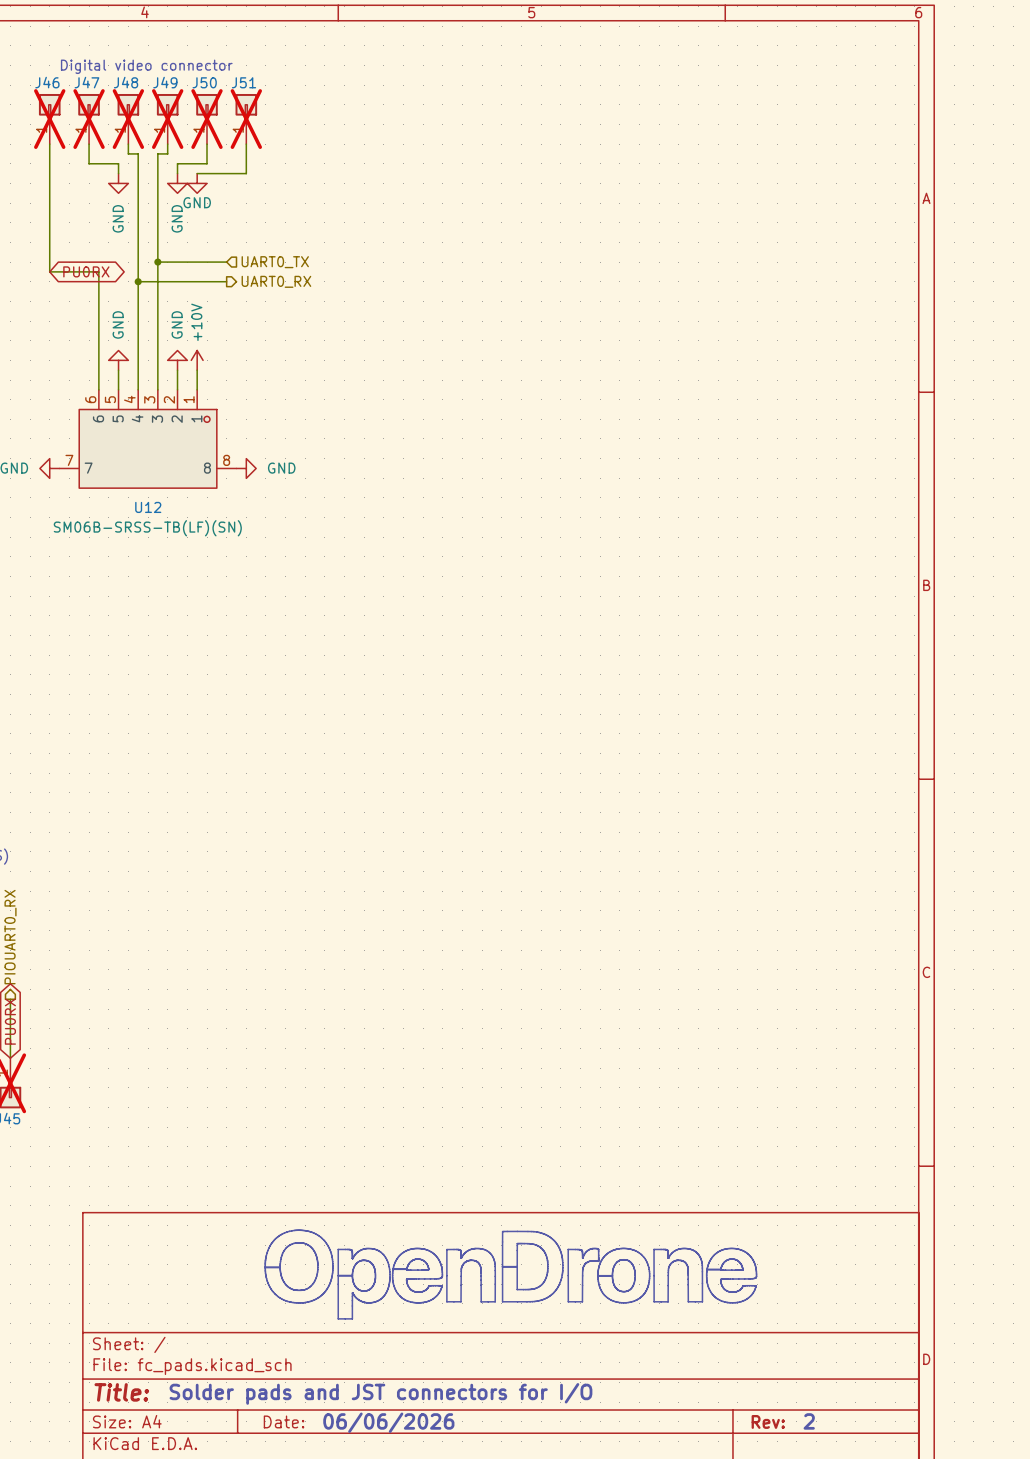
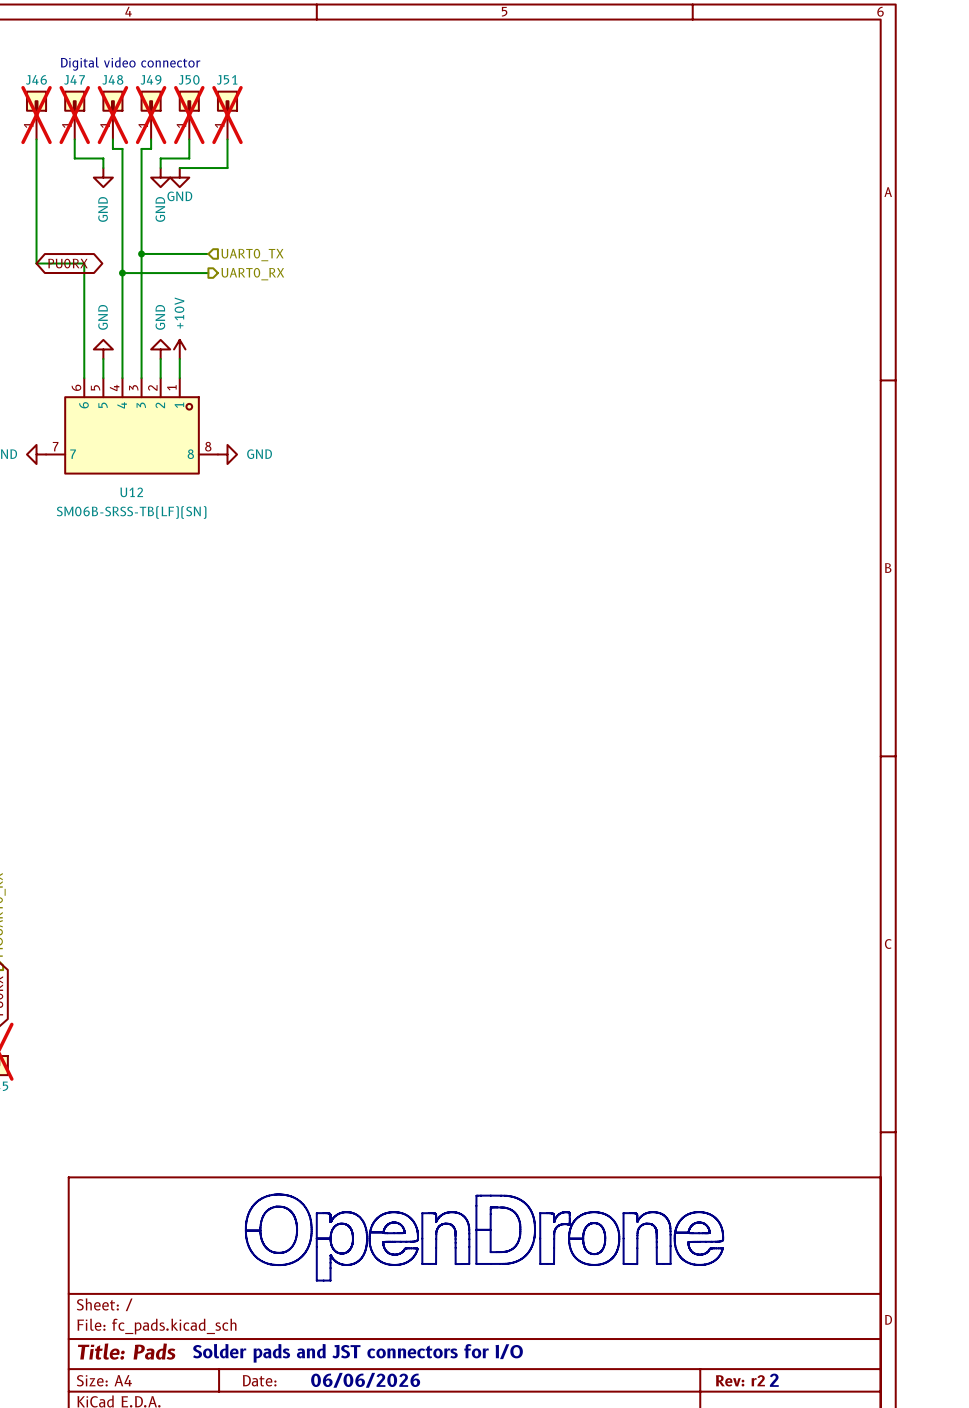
title block: Title: (121, 1392) -> Title: Pads (126, 1351)
title block: Rev: (768, 1421) -> Rev: r2 (740, 1380)

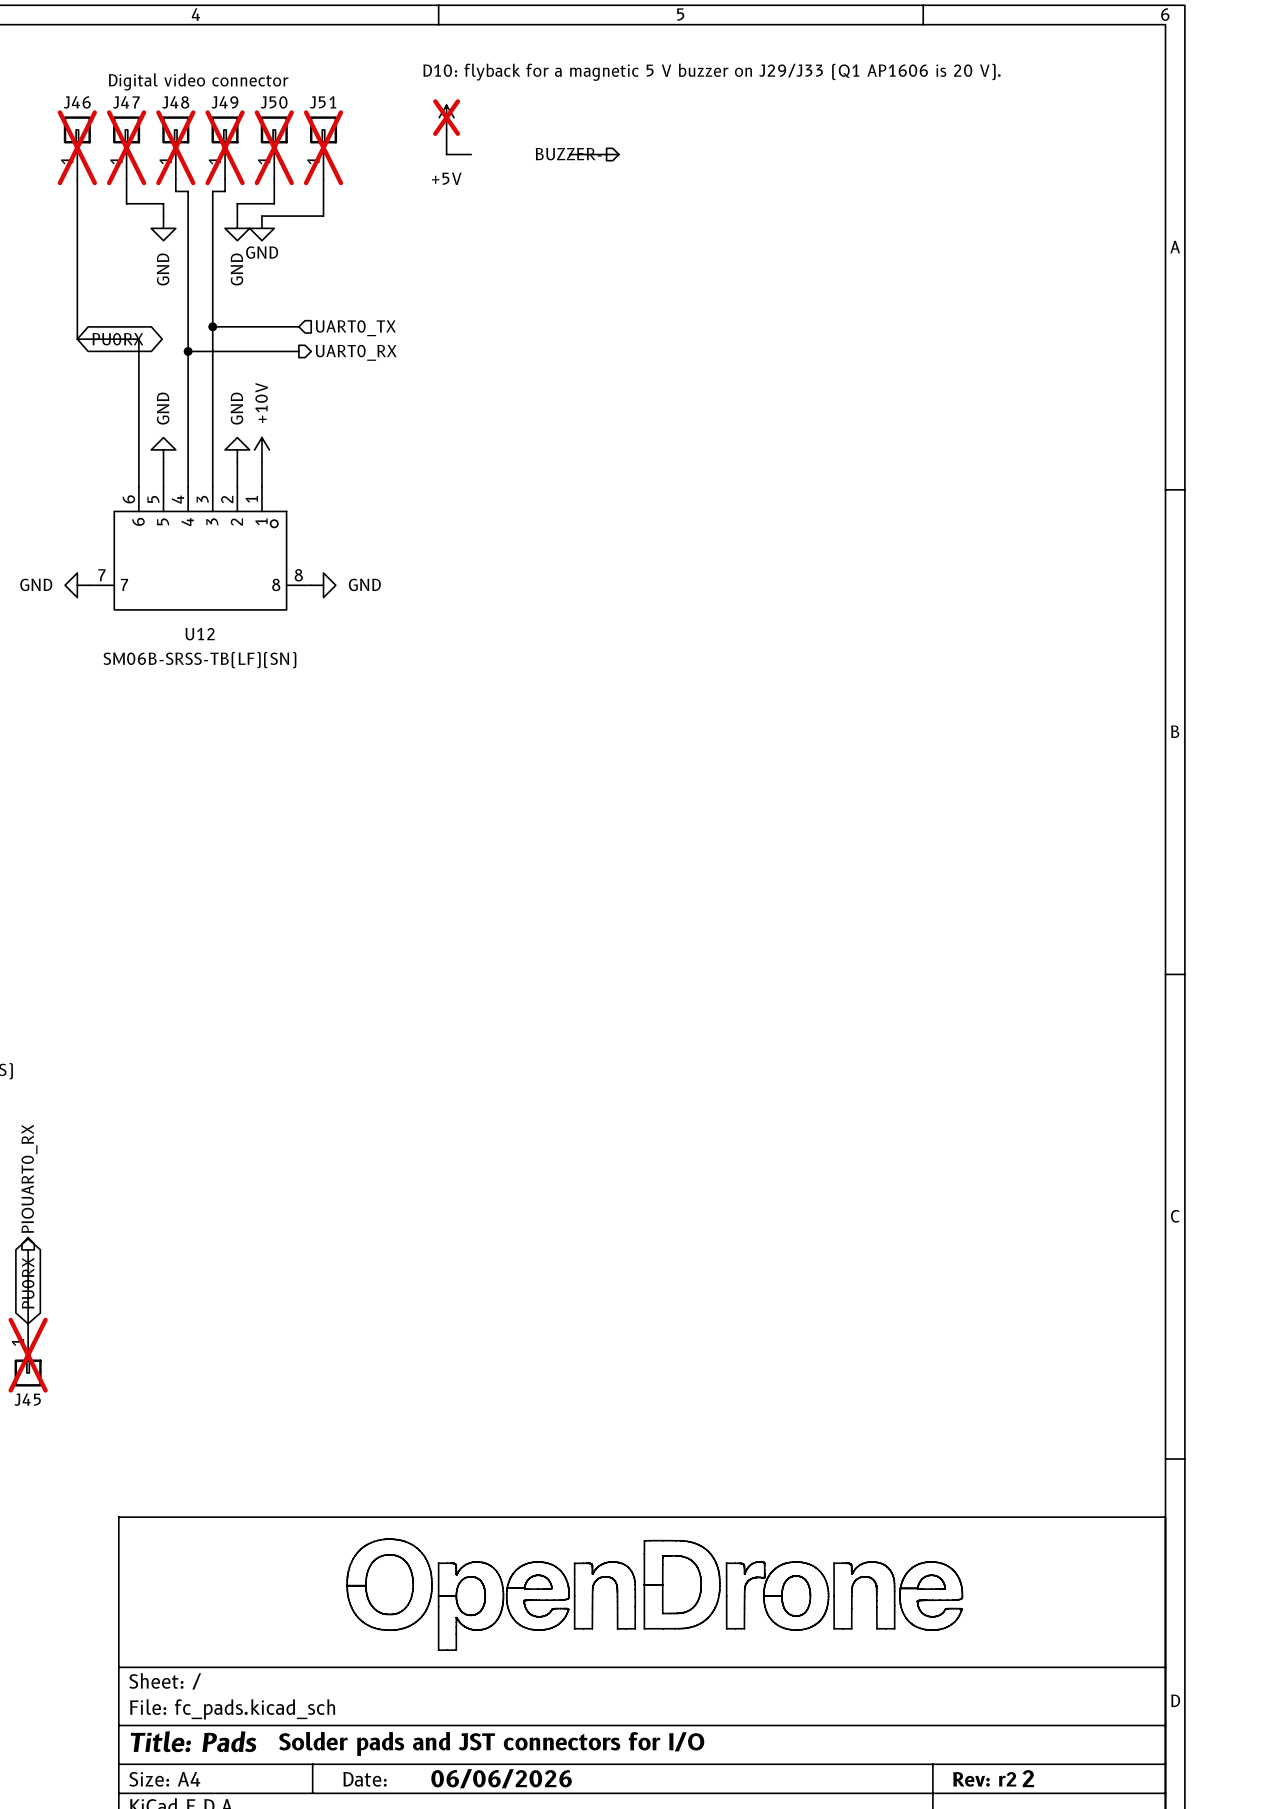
text: none -> D10: flyback for a magnetic 5 V buzzer on J29/J33 (Q1 AP1606 is 20 V). (712, 72)
power symbol: none -> +5V (446, 117)
wire: none -> (446, 129) (446, 154) (471, 154)
hierarchical label: none -> BUZZER- (568, 154)
wire: none -> (569, 154) (618, 154)

